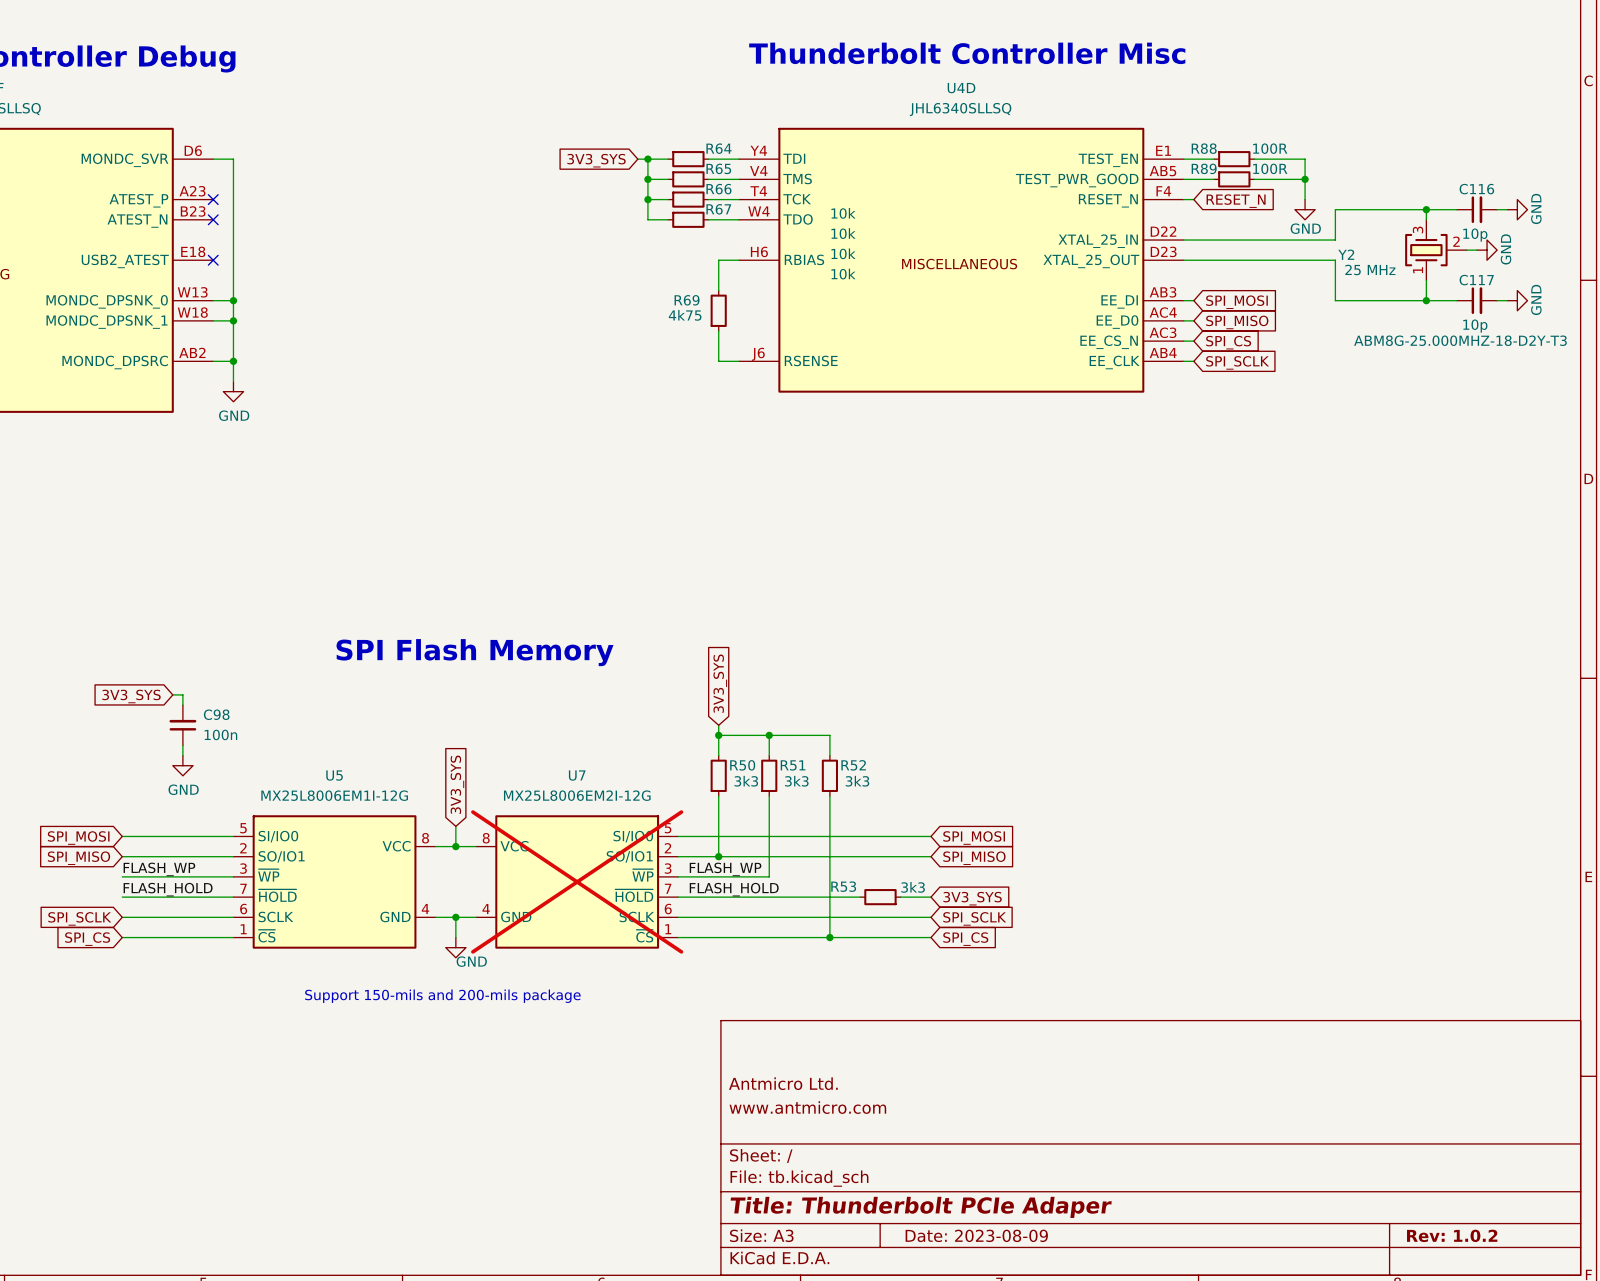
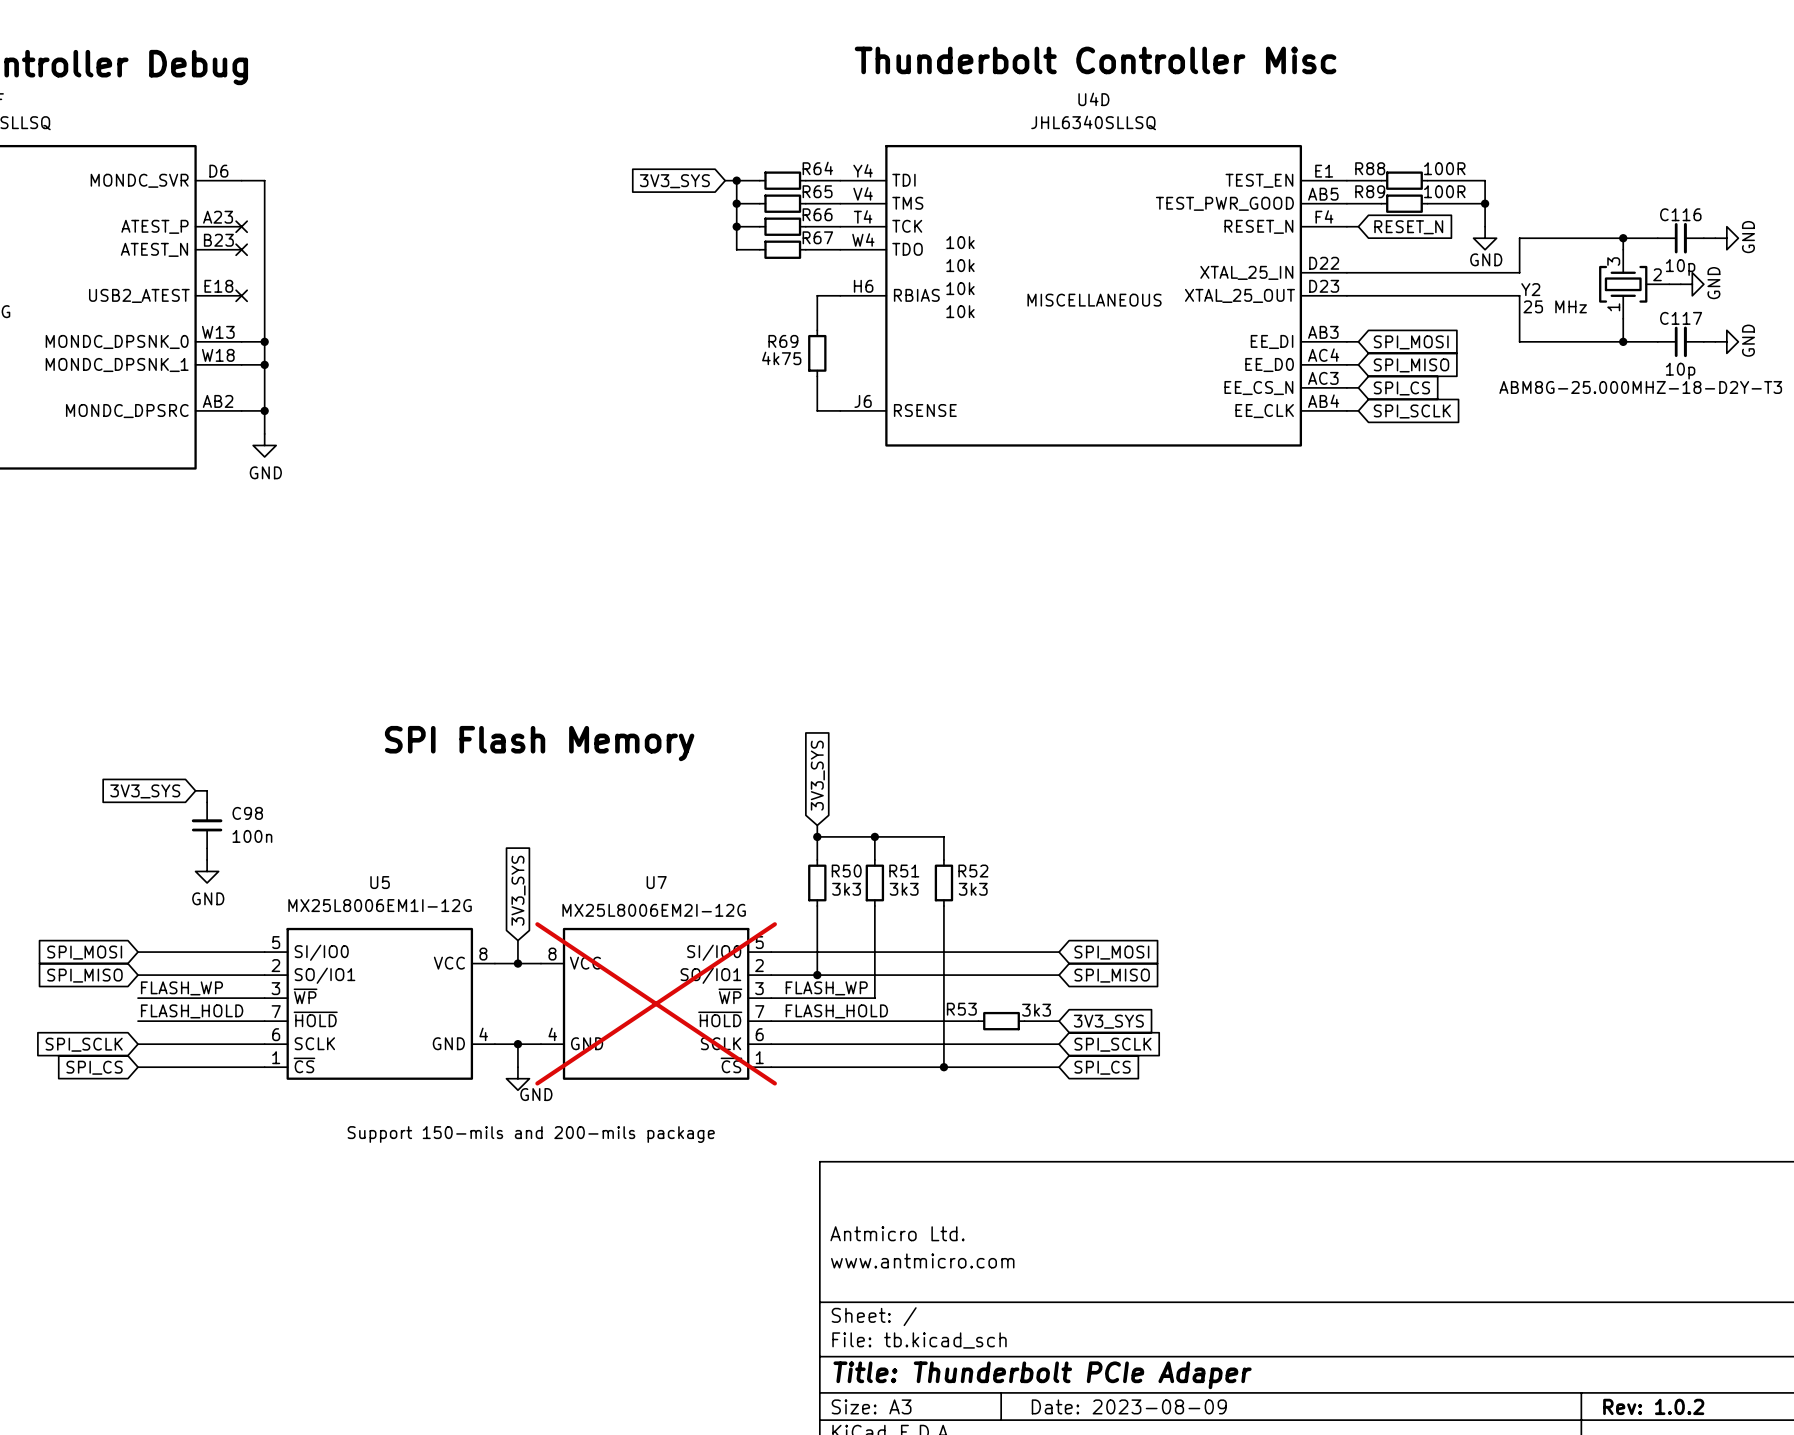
U7 text: MX25L8006EM2I-12G (577, 795) -> none
U7 value: none -> MX25L8006EM2I-12G (654, 910)

